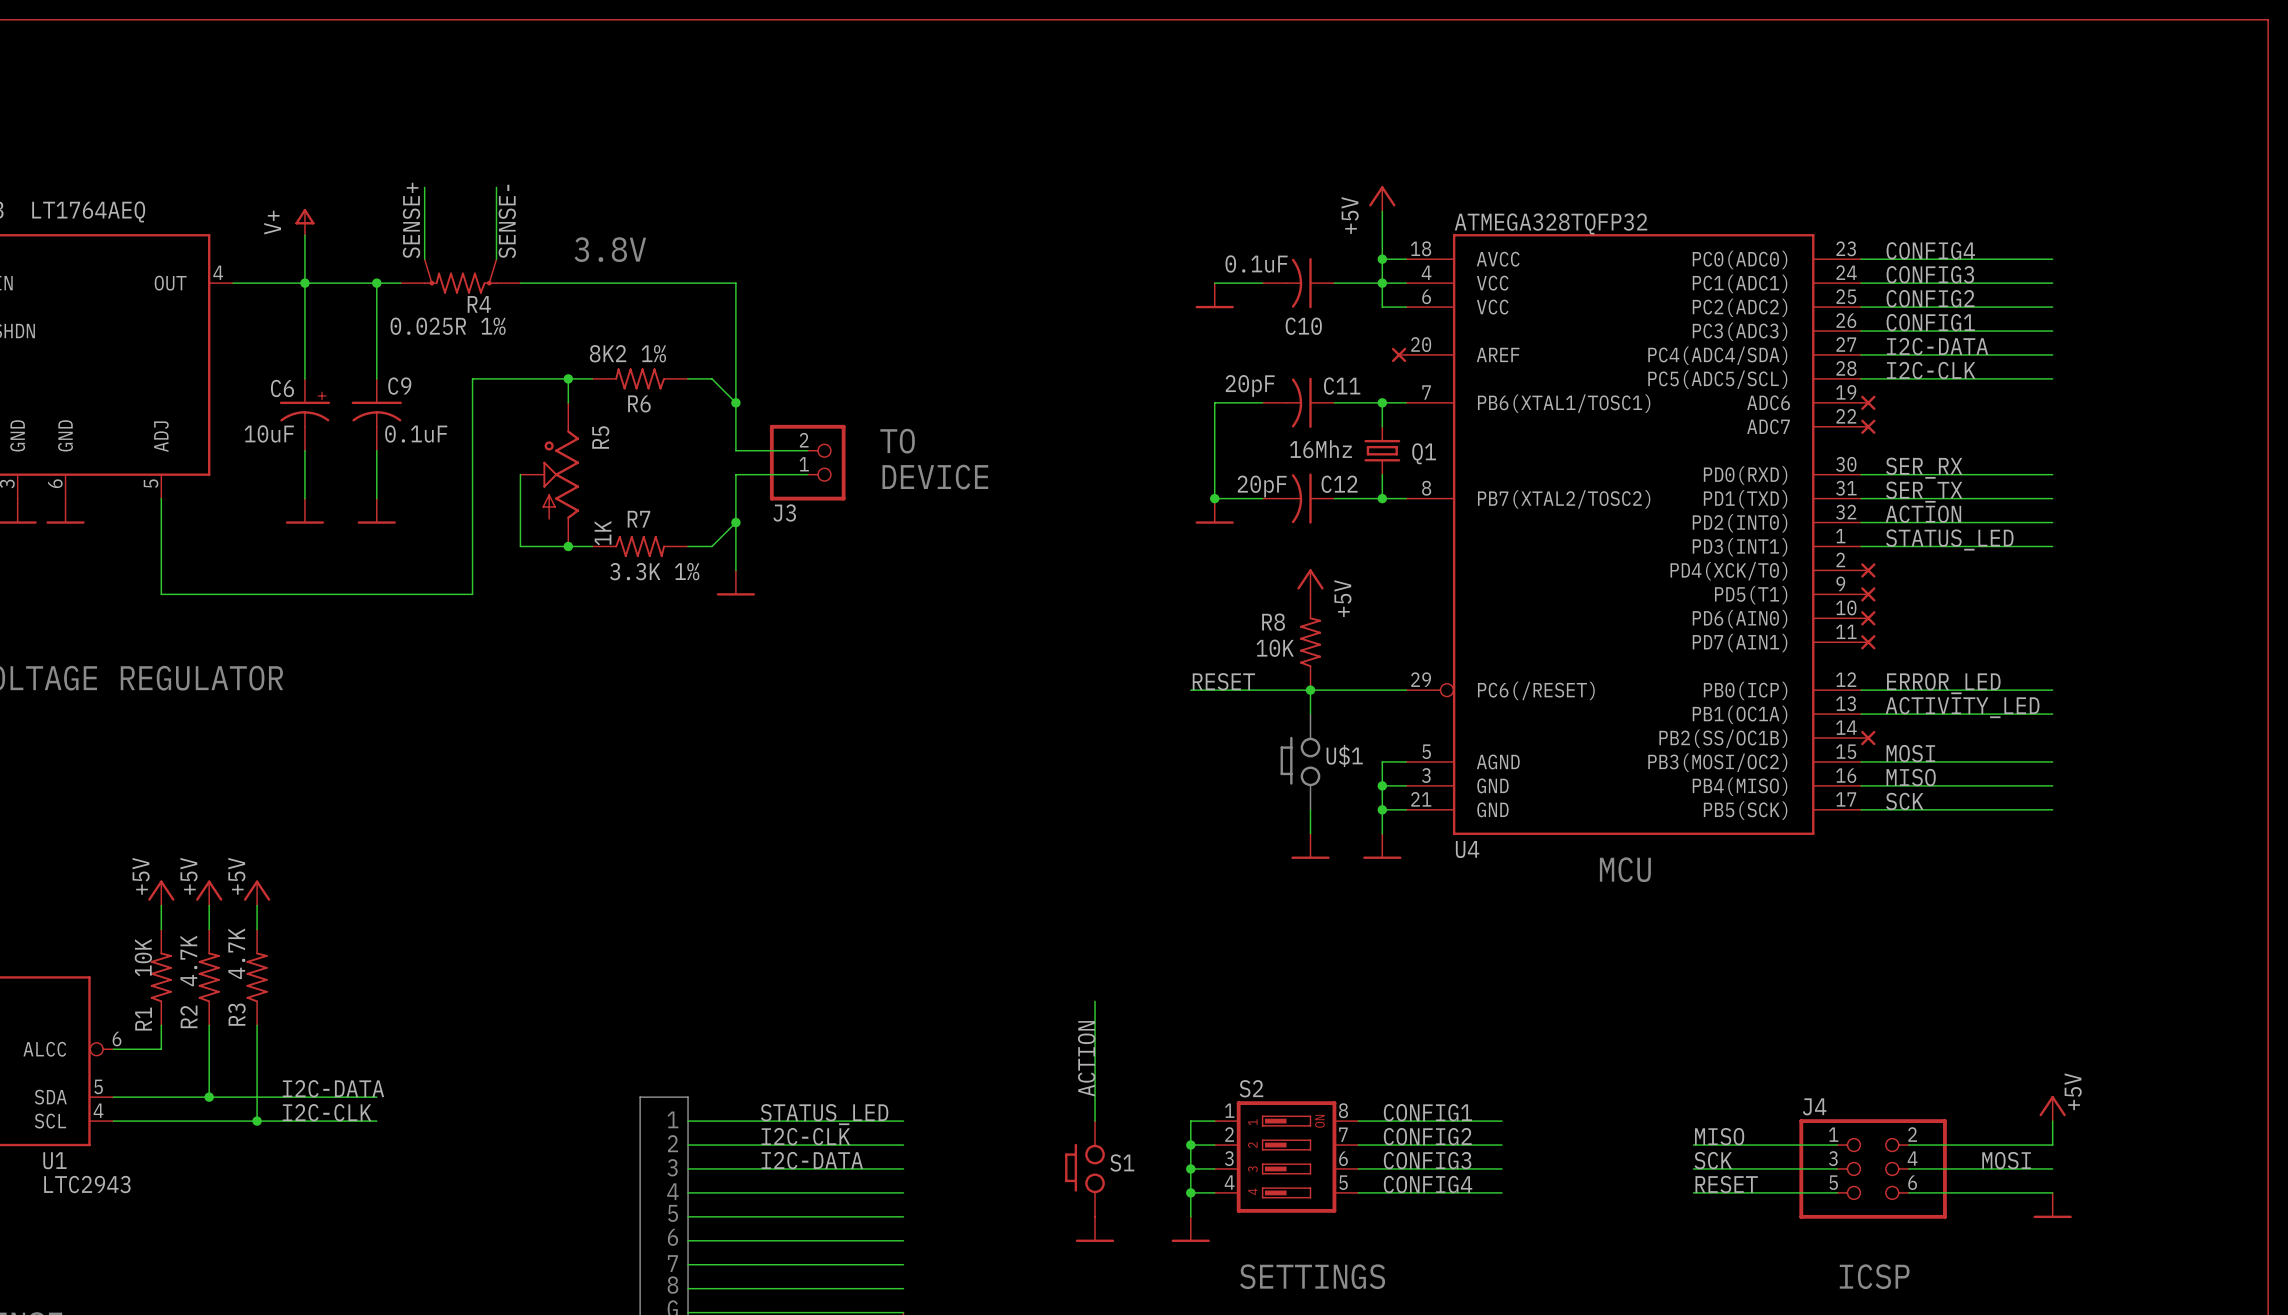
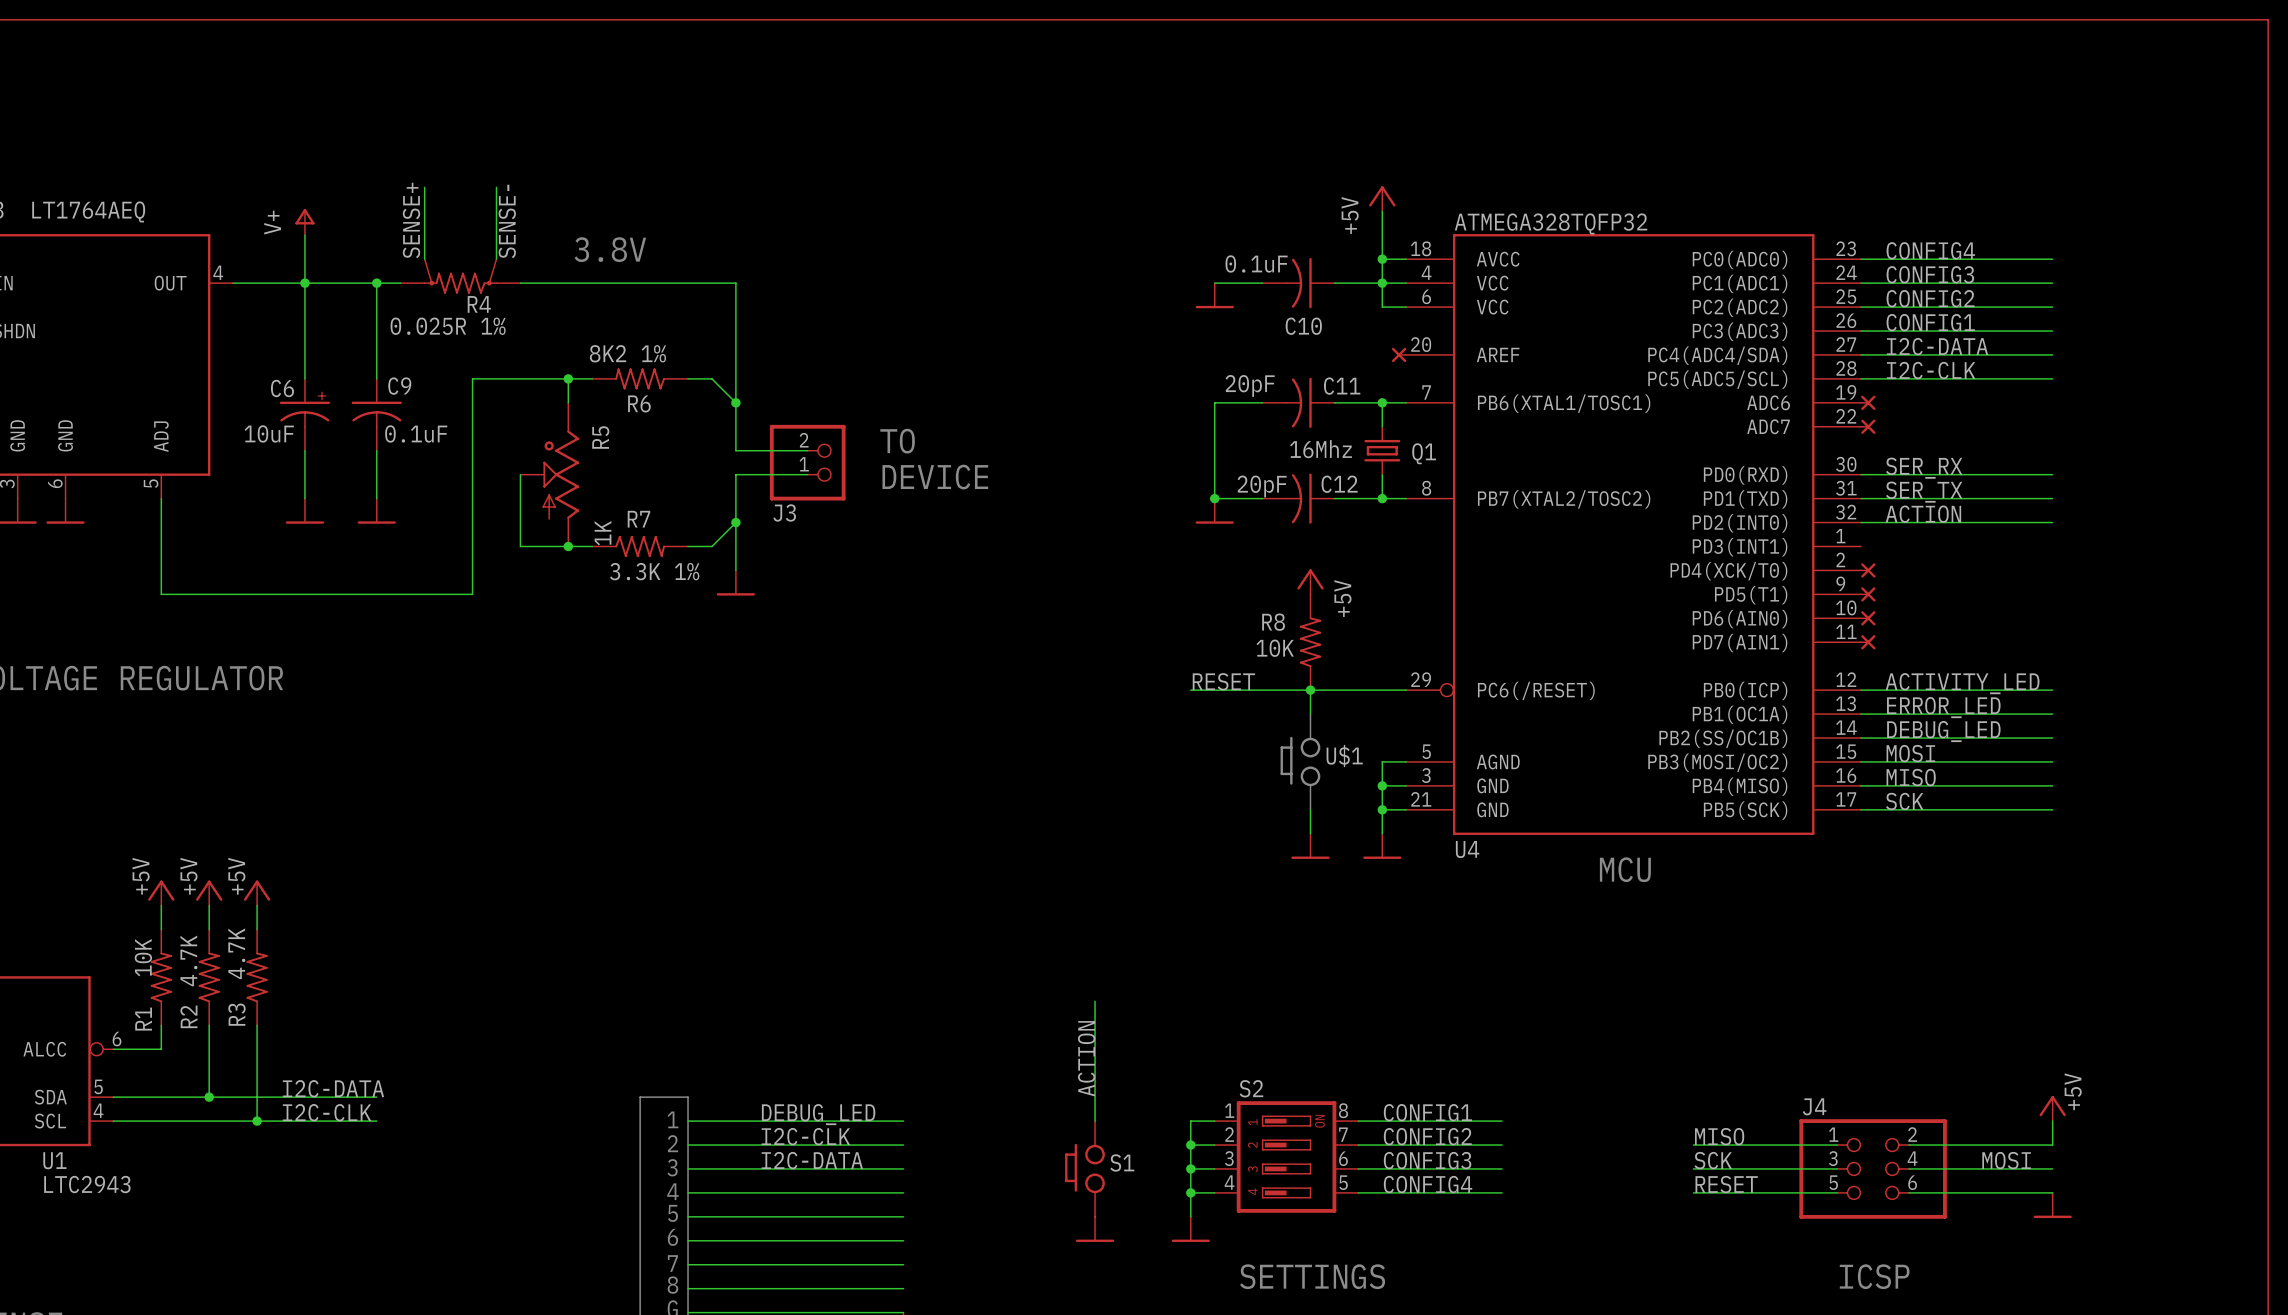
label: STATUS_LED (1949, 540) -> none
wire: (1861, 546) (2052, 546) -> (1861, 738) (2052, 738)
label: ERROR_LED (1943, 683) -> ACTIVITY_LED (1962, 683)
label: ACTIVITY_LED (1962, 707) -> ERROR_LED (1943, 707)
label: none -> DEBUG_LED (1943, 731)
part: (1867, 738) -> none
label: STATUS_LED (824, 1114) -> DEBUG_LED (818, 1114)

